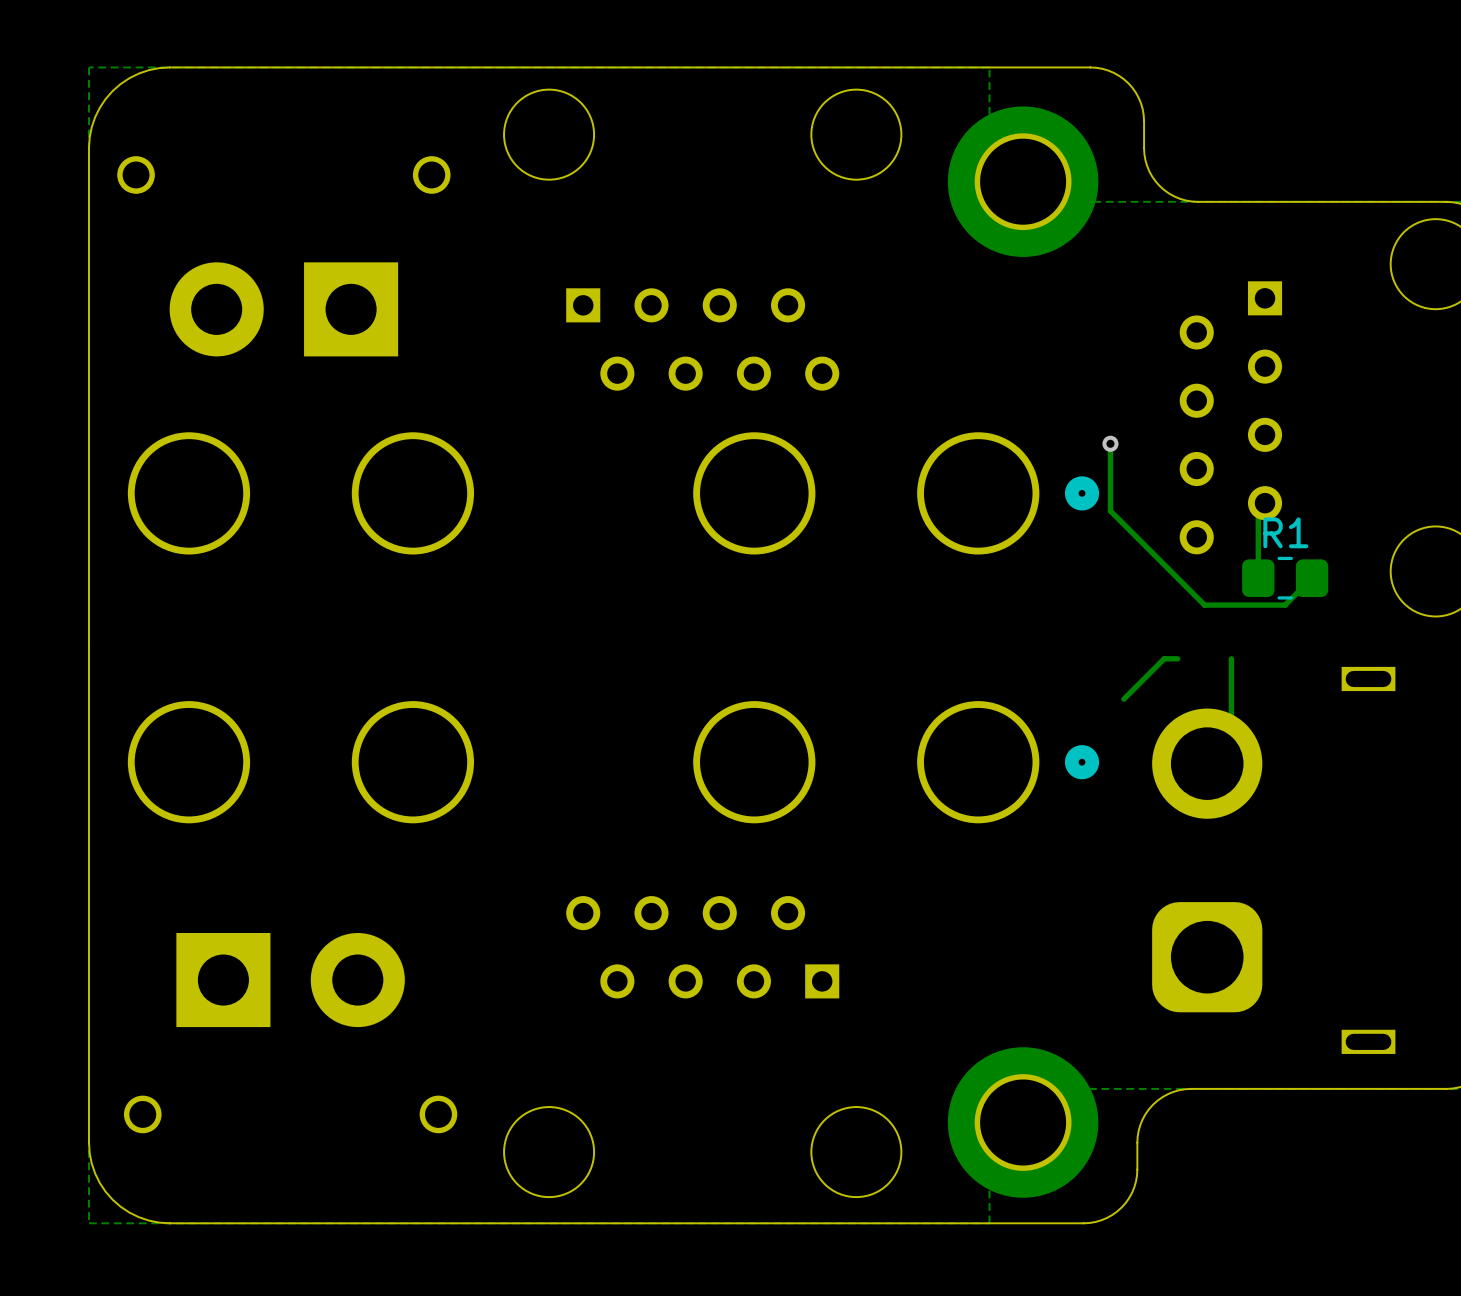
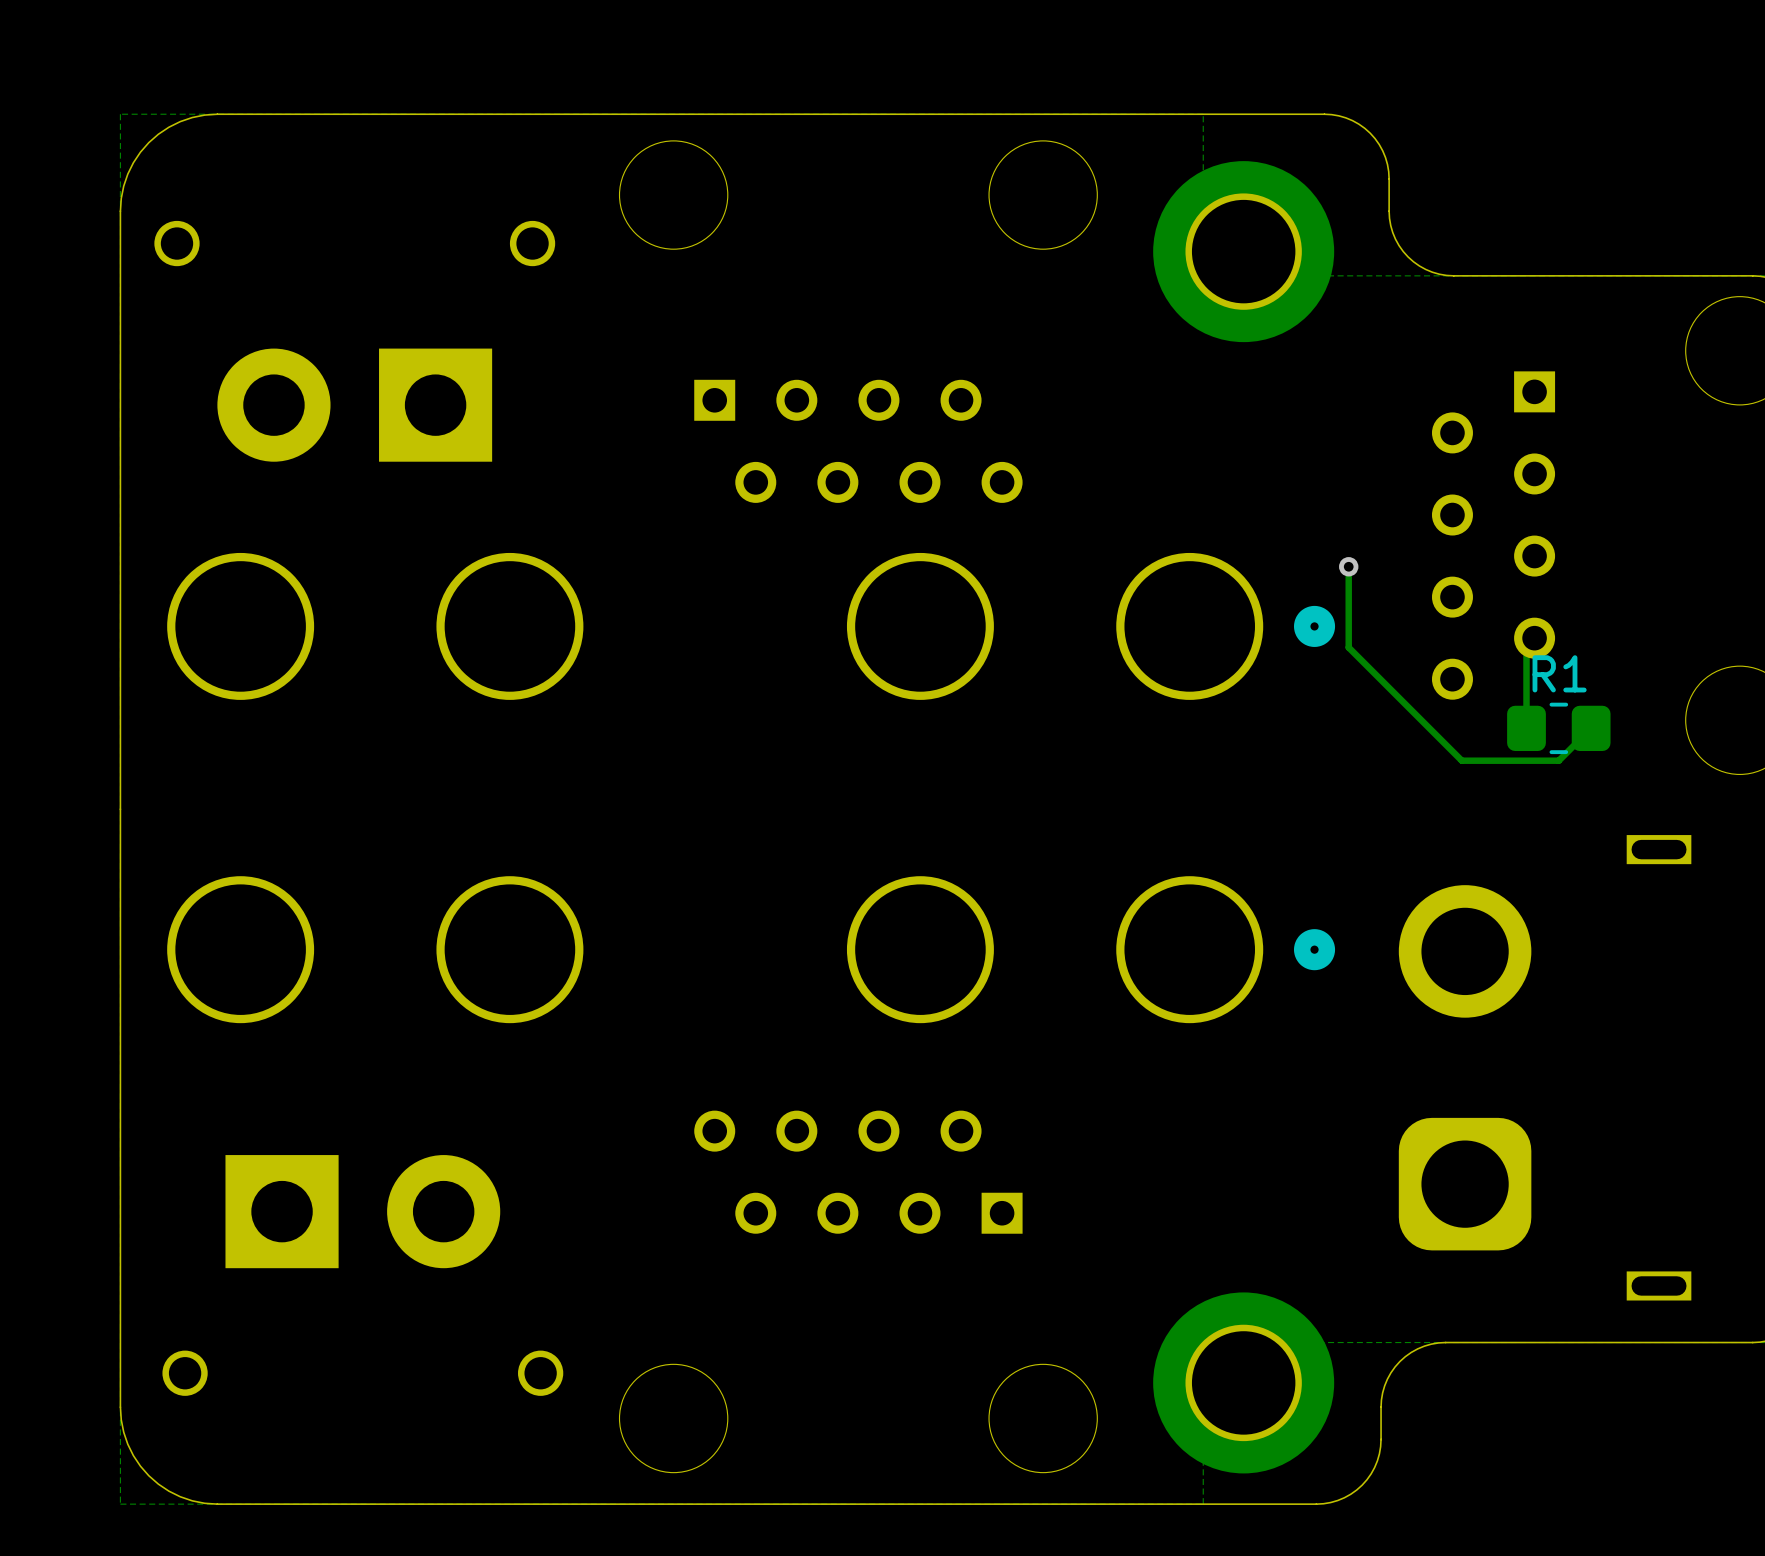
track: (1177, 658) (1164, 658) (1123, 699) -> none
track: (1231, 658) (1231, 739) (1207, 763) -> none

